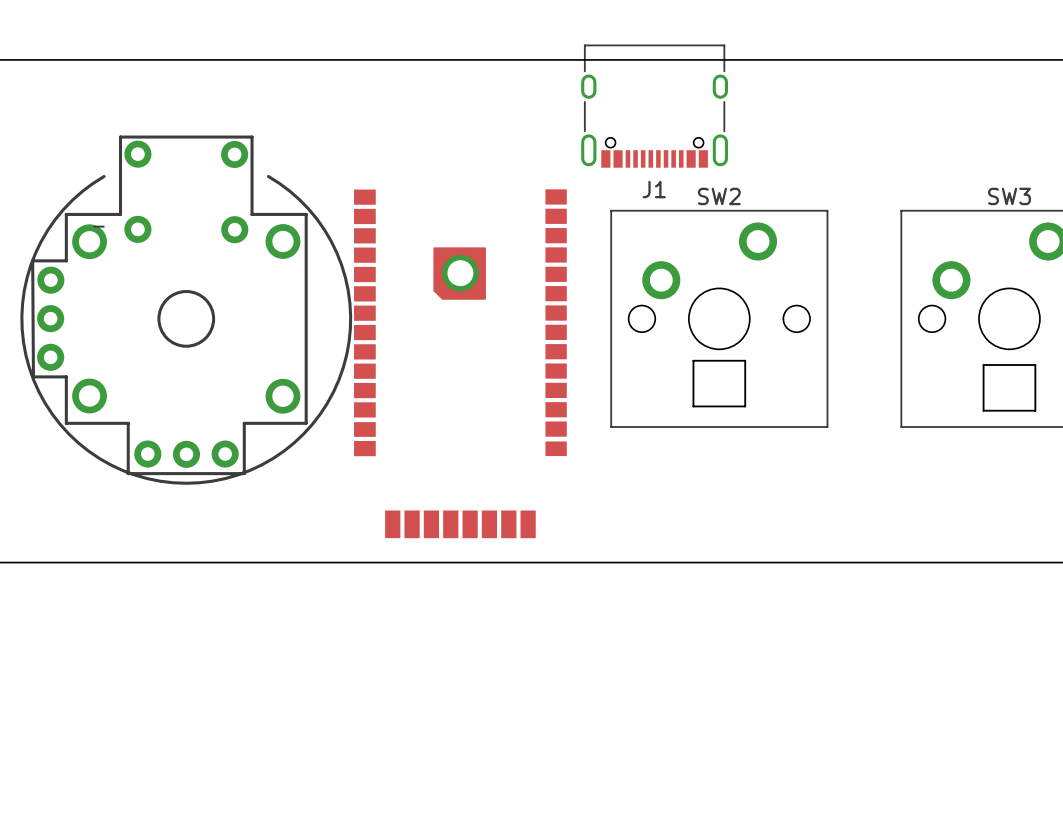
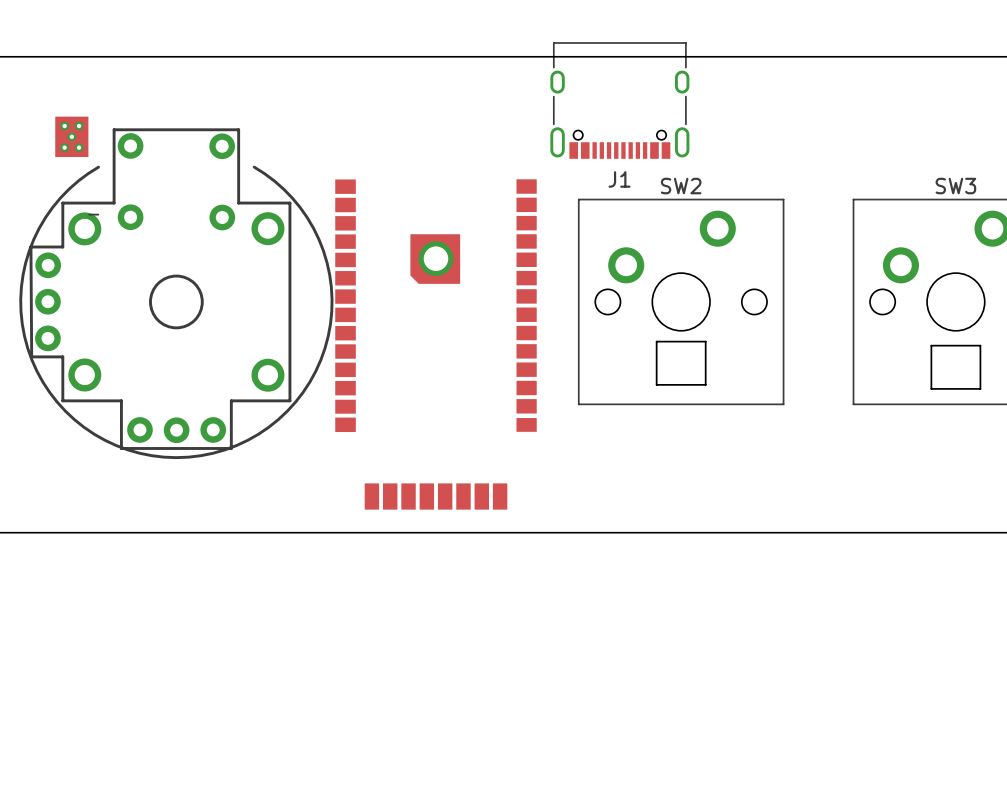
part: none -> (71, 136)

